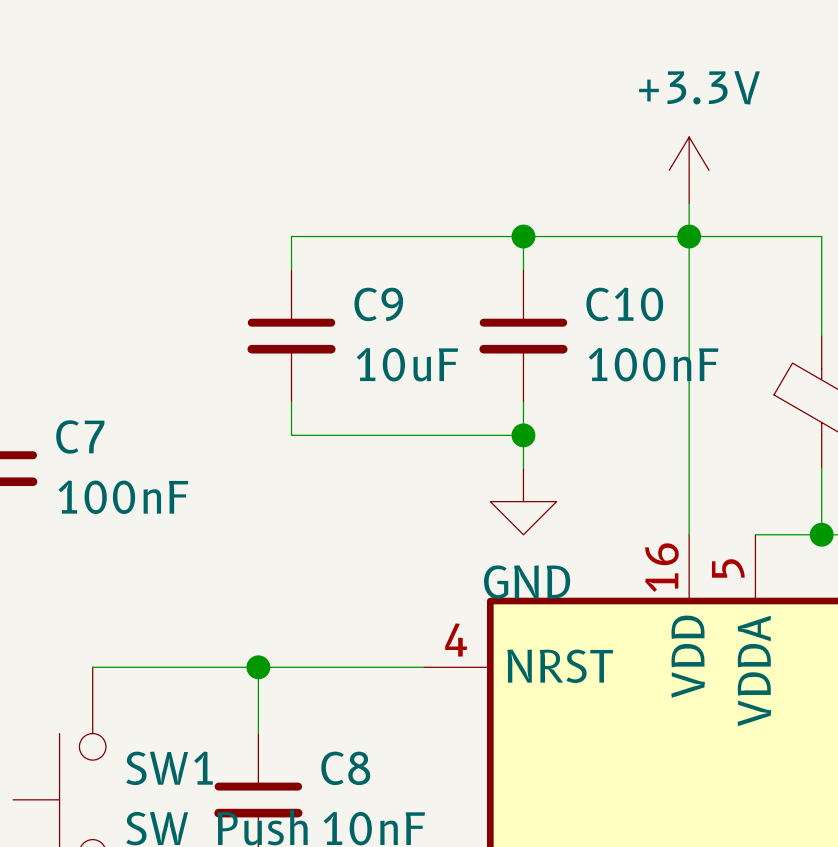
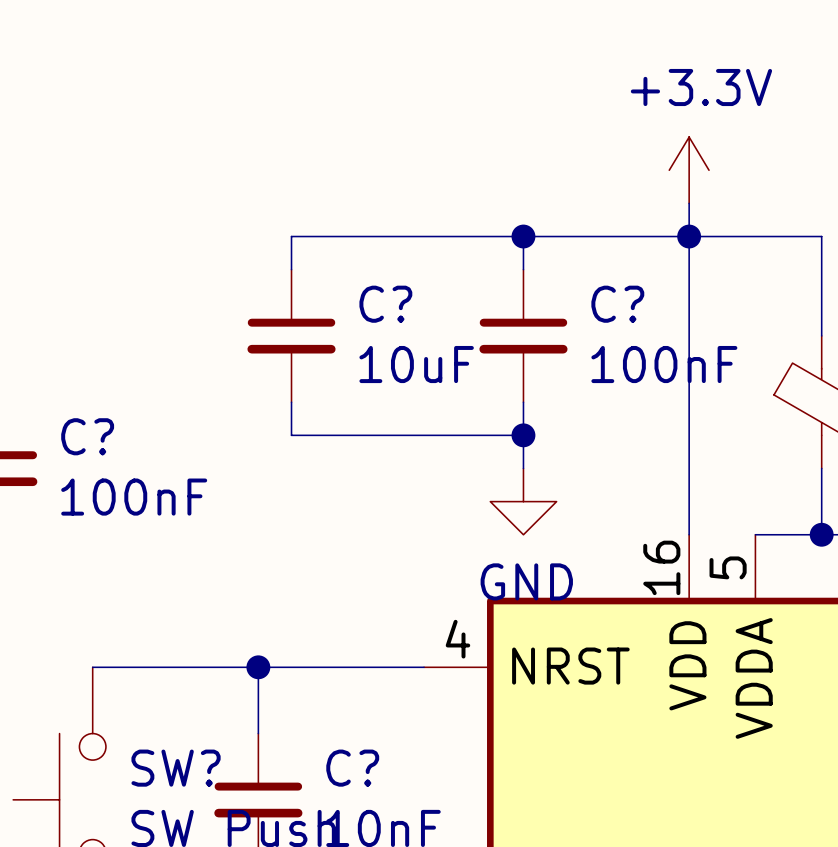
C9 name: C9 (378, 304) -> C? (385, 304)
C10 name: C10 (624, 304) -> C? (617, 304)
C7 name: C7 (80, 436) -> C? (87, 436)
SW1 name: SW1 (169, 768) -> SW? (176, 768)
C8 name: C8 (345, 768) -> C? (352, 768)

